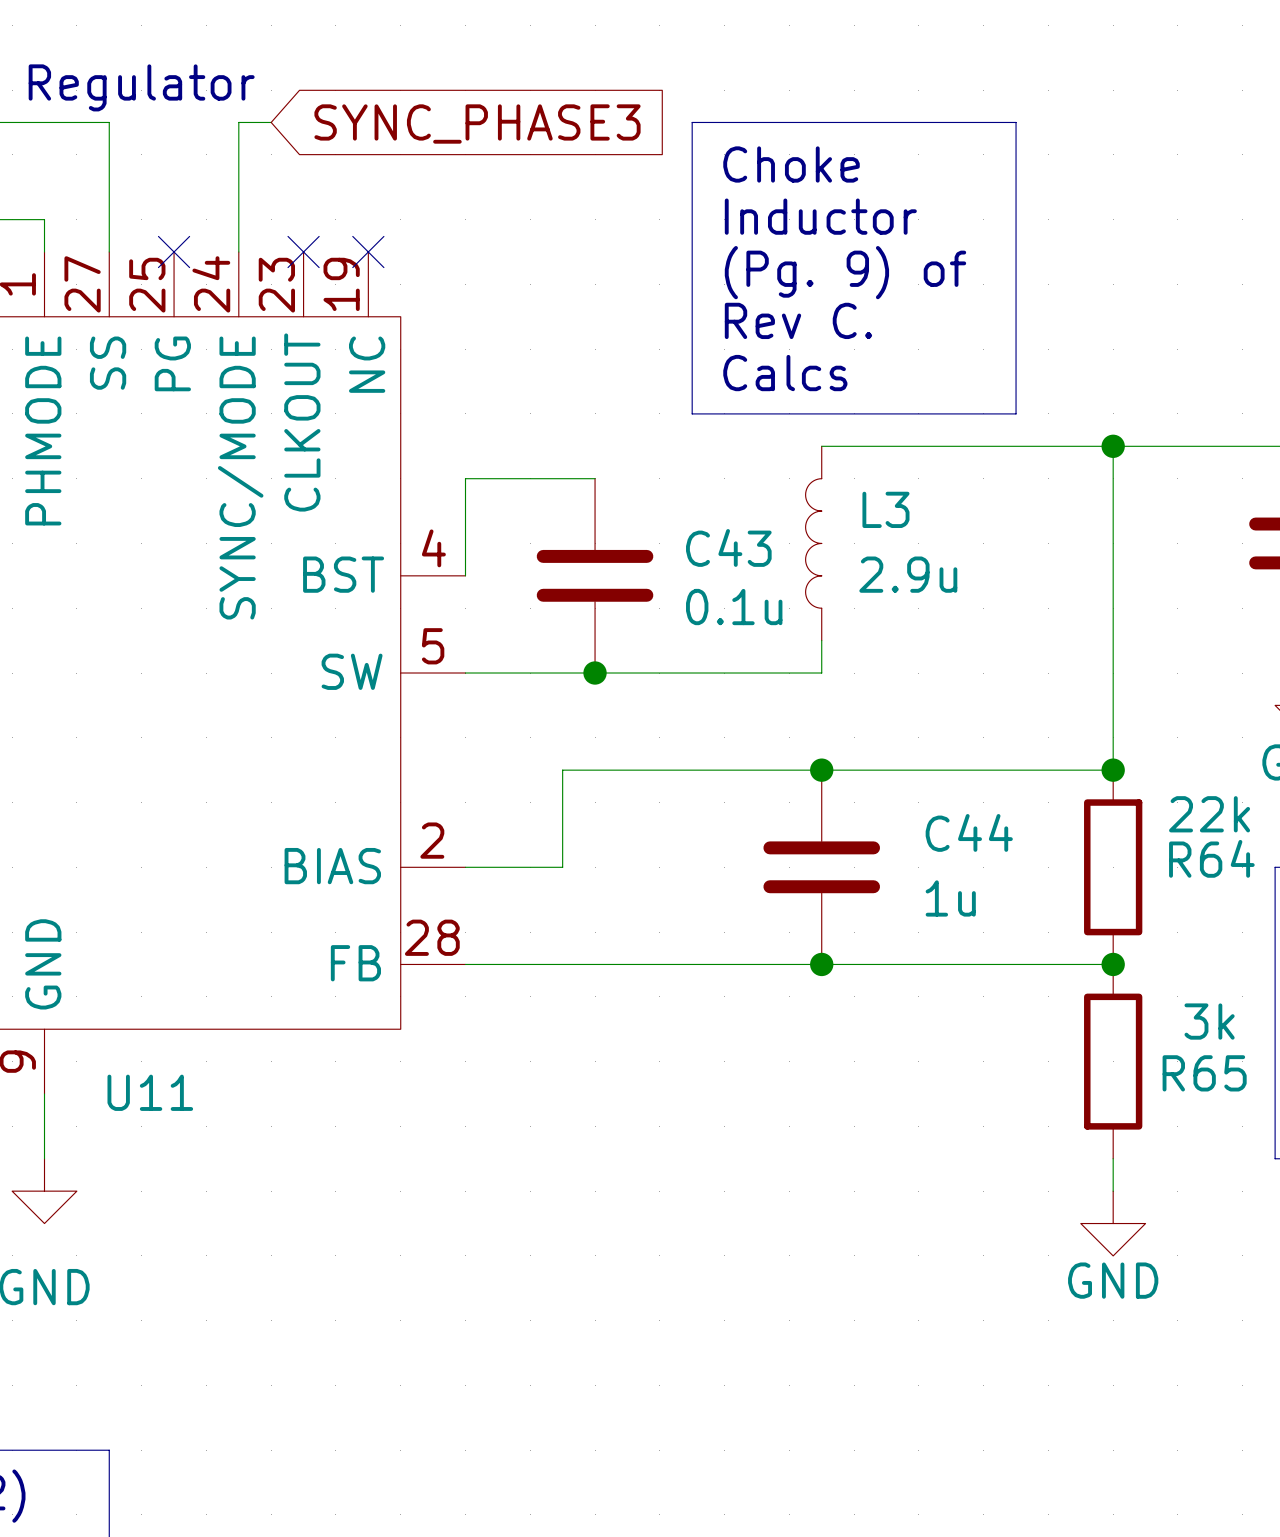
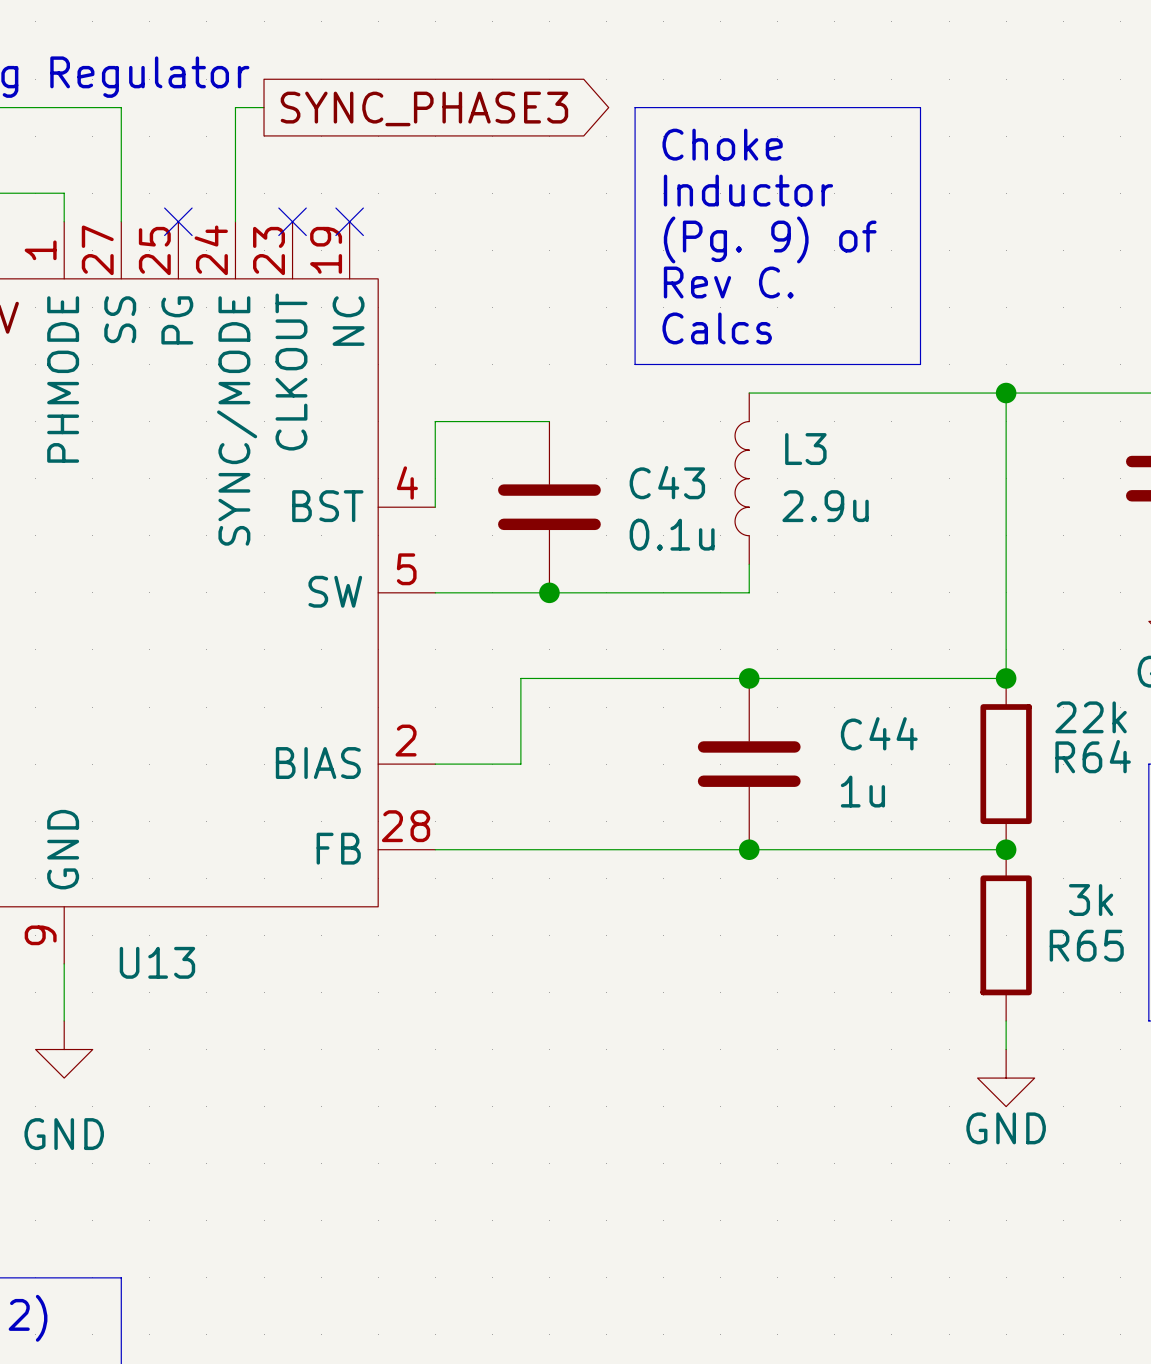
global label shape: input (477, 124) -> output (424, 108)
U11 name: U11 (150, 1092) -> U13 (157, 962)

